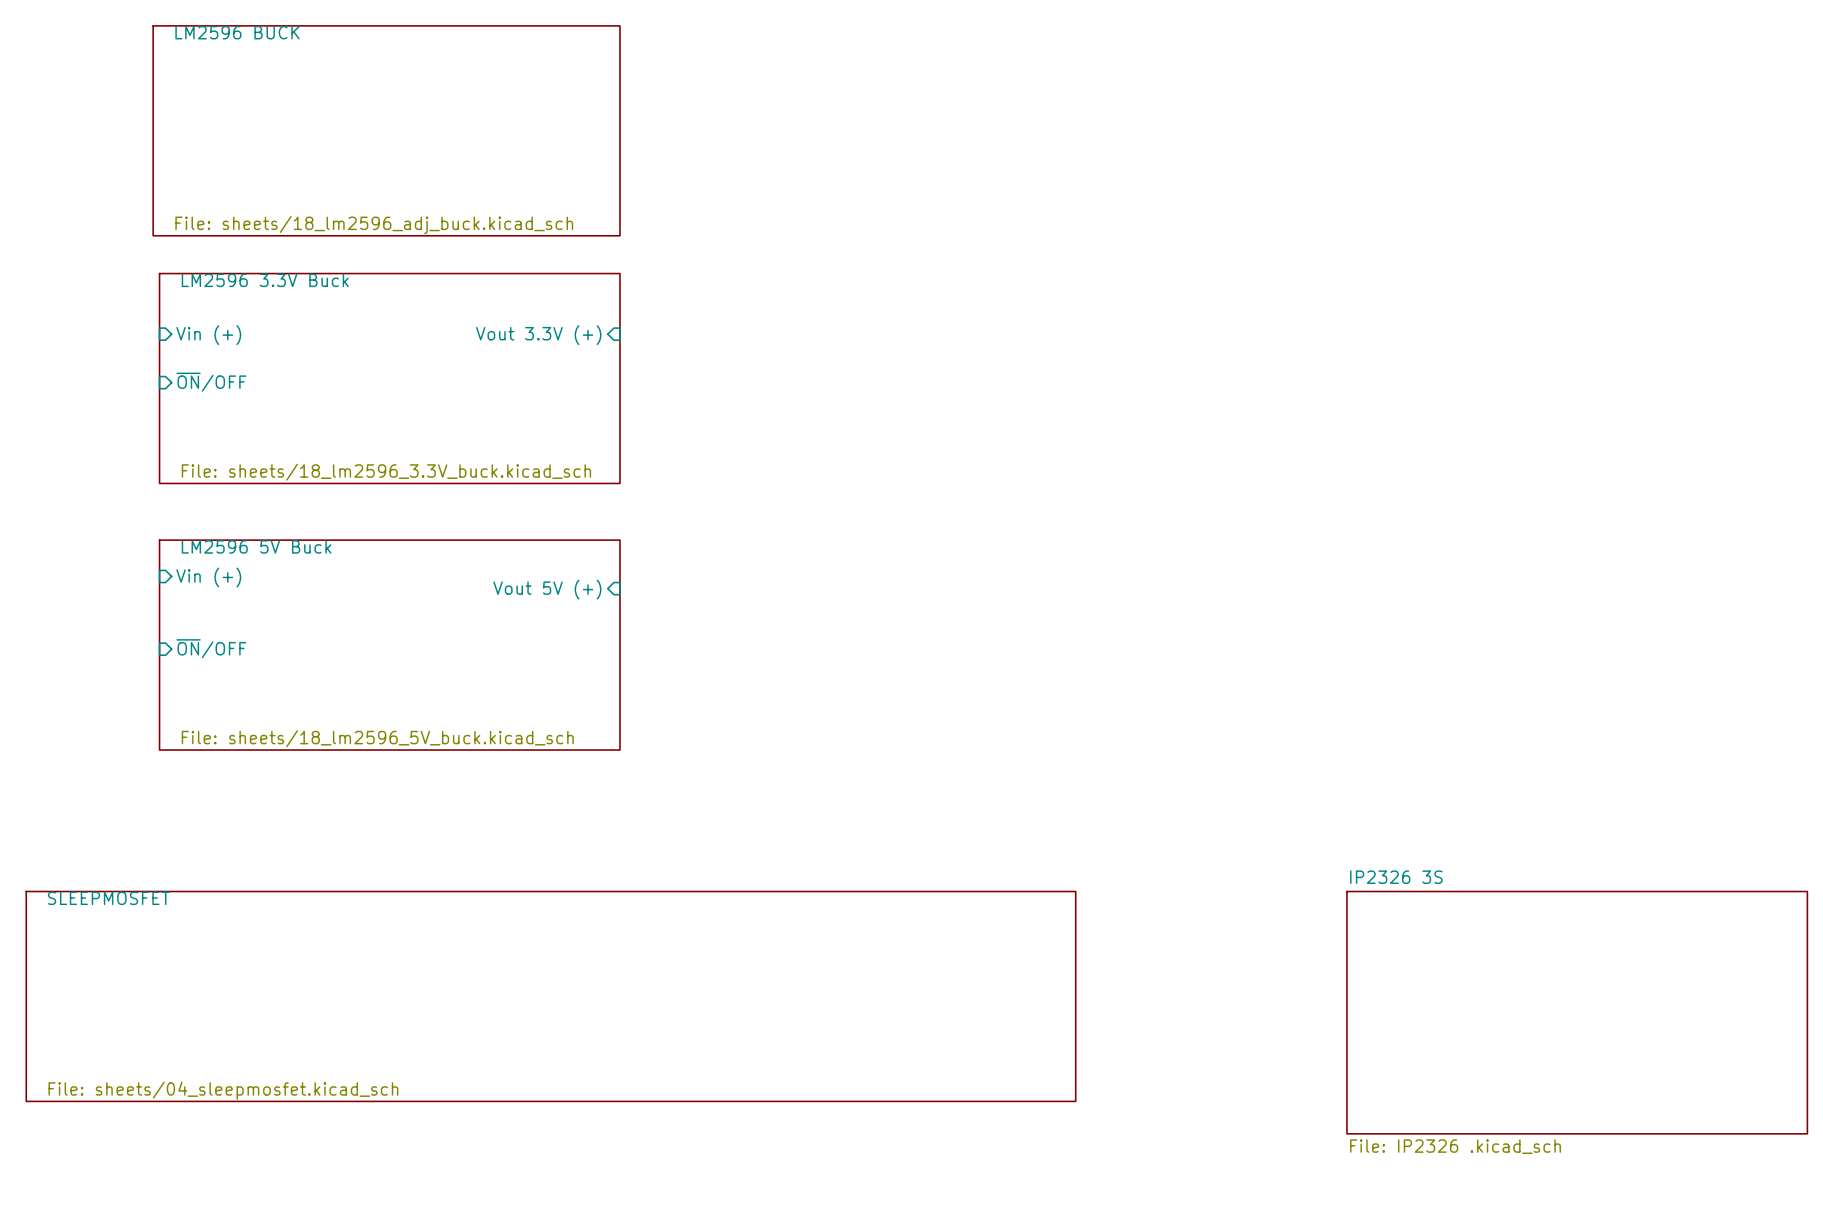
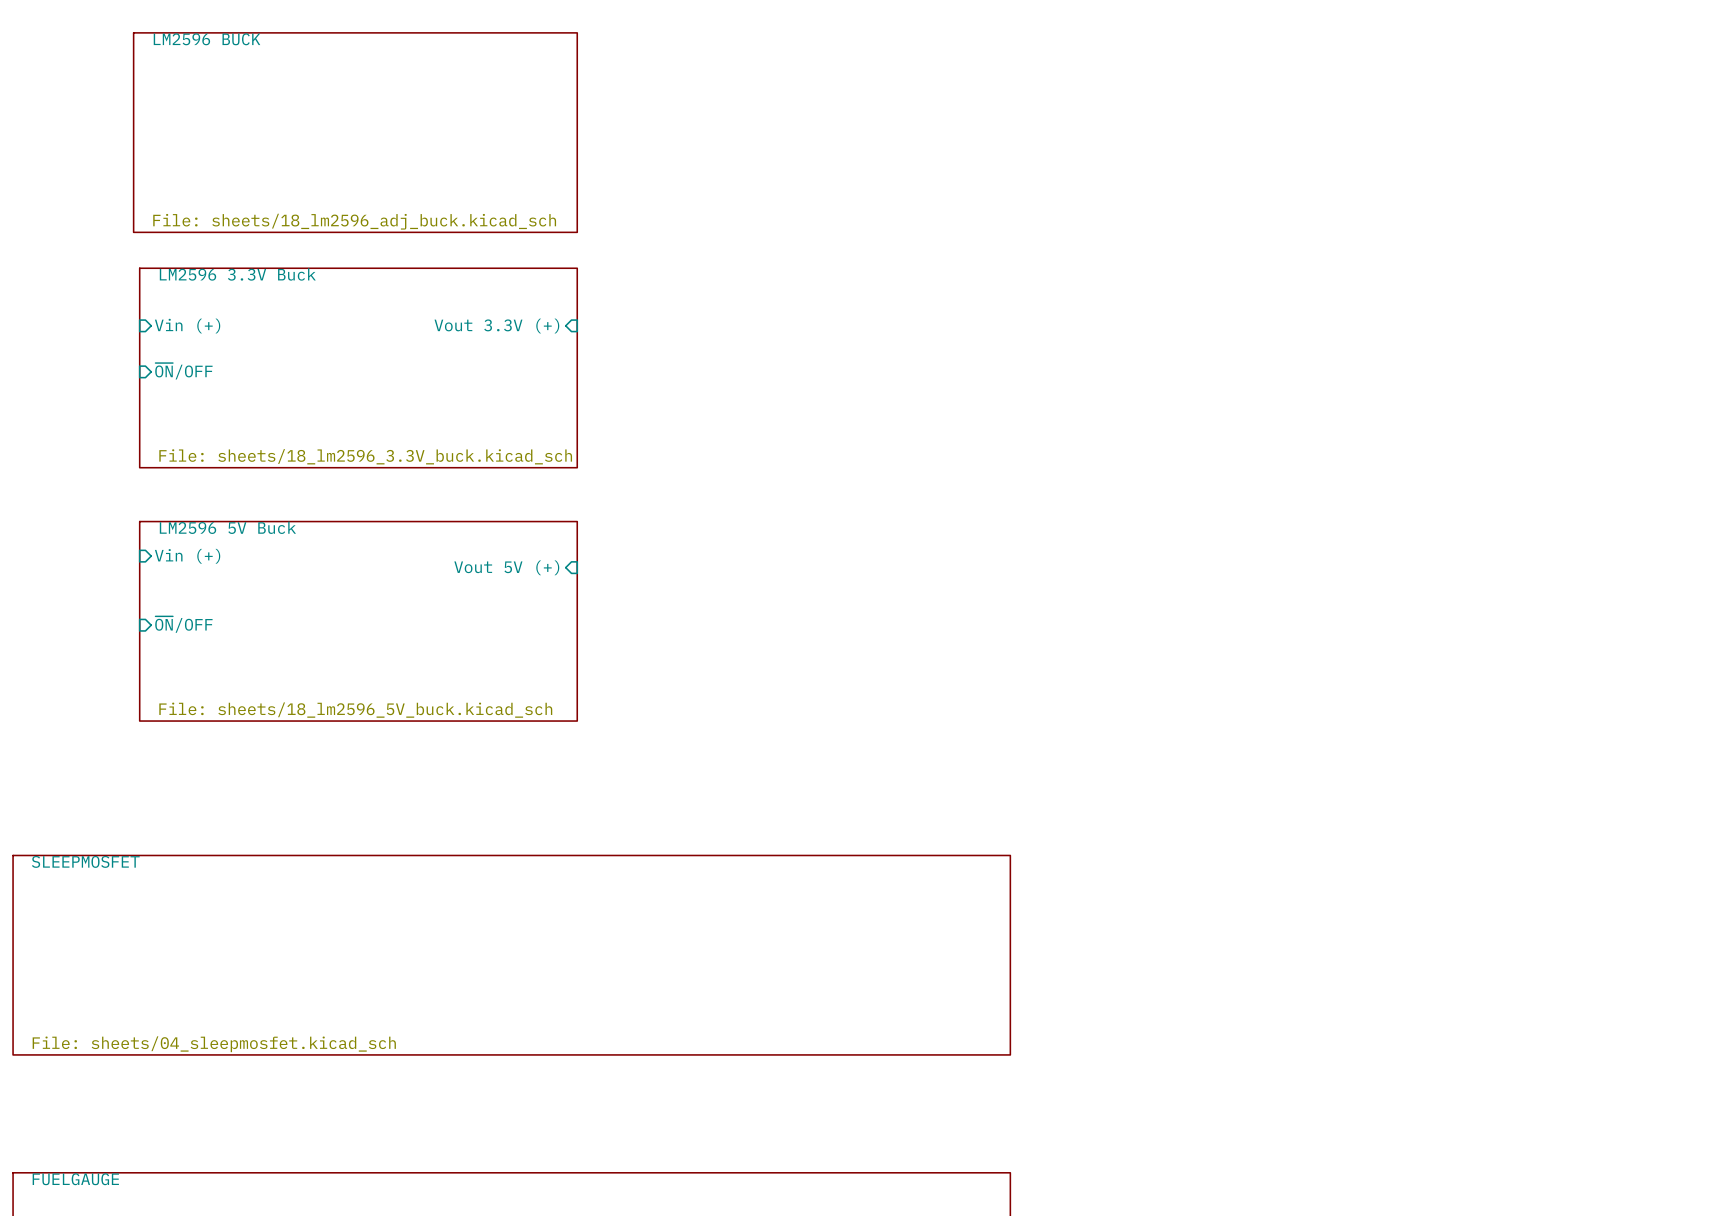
sheet IP2326 3S: File: IP2326 .kicad_sch (1577, 1012) -> none

